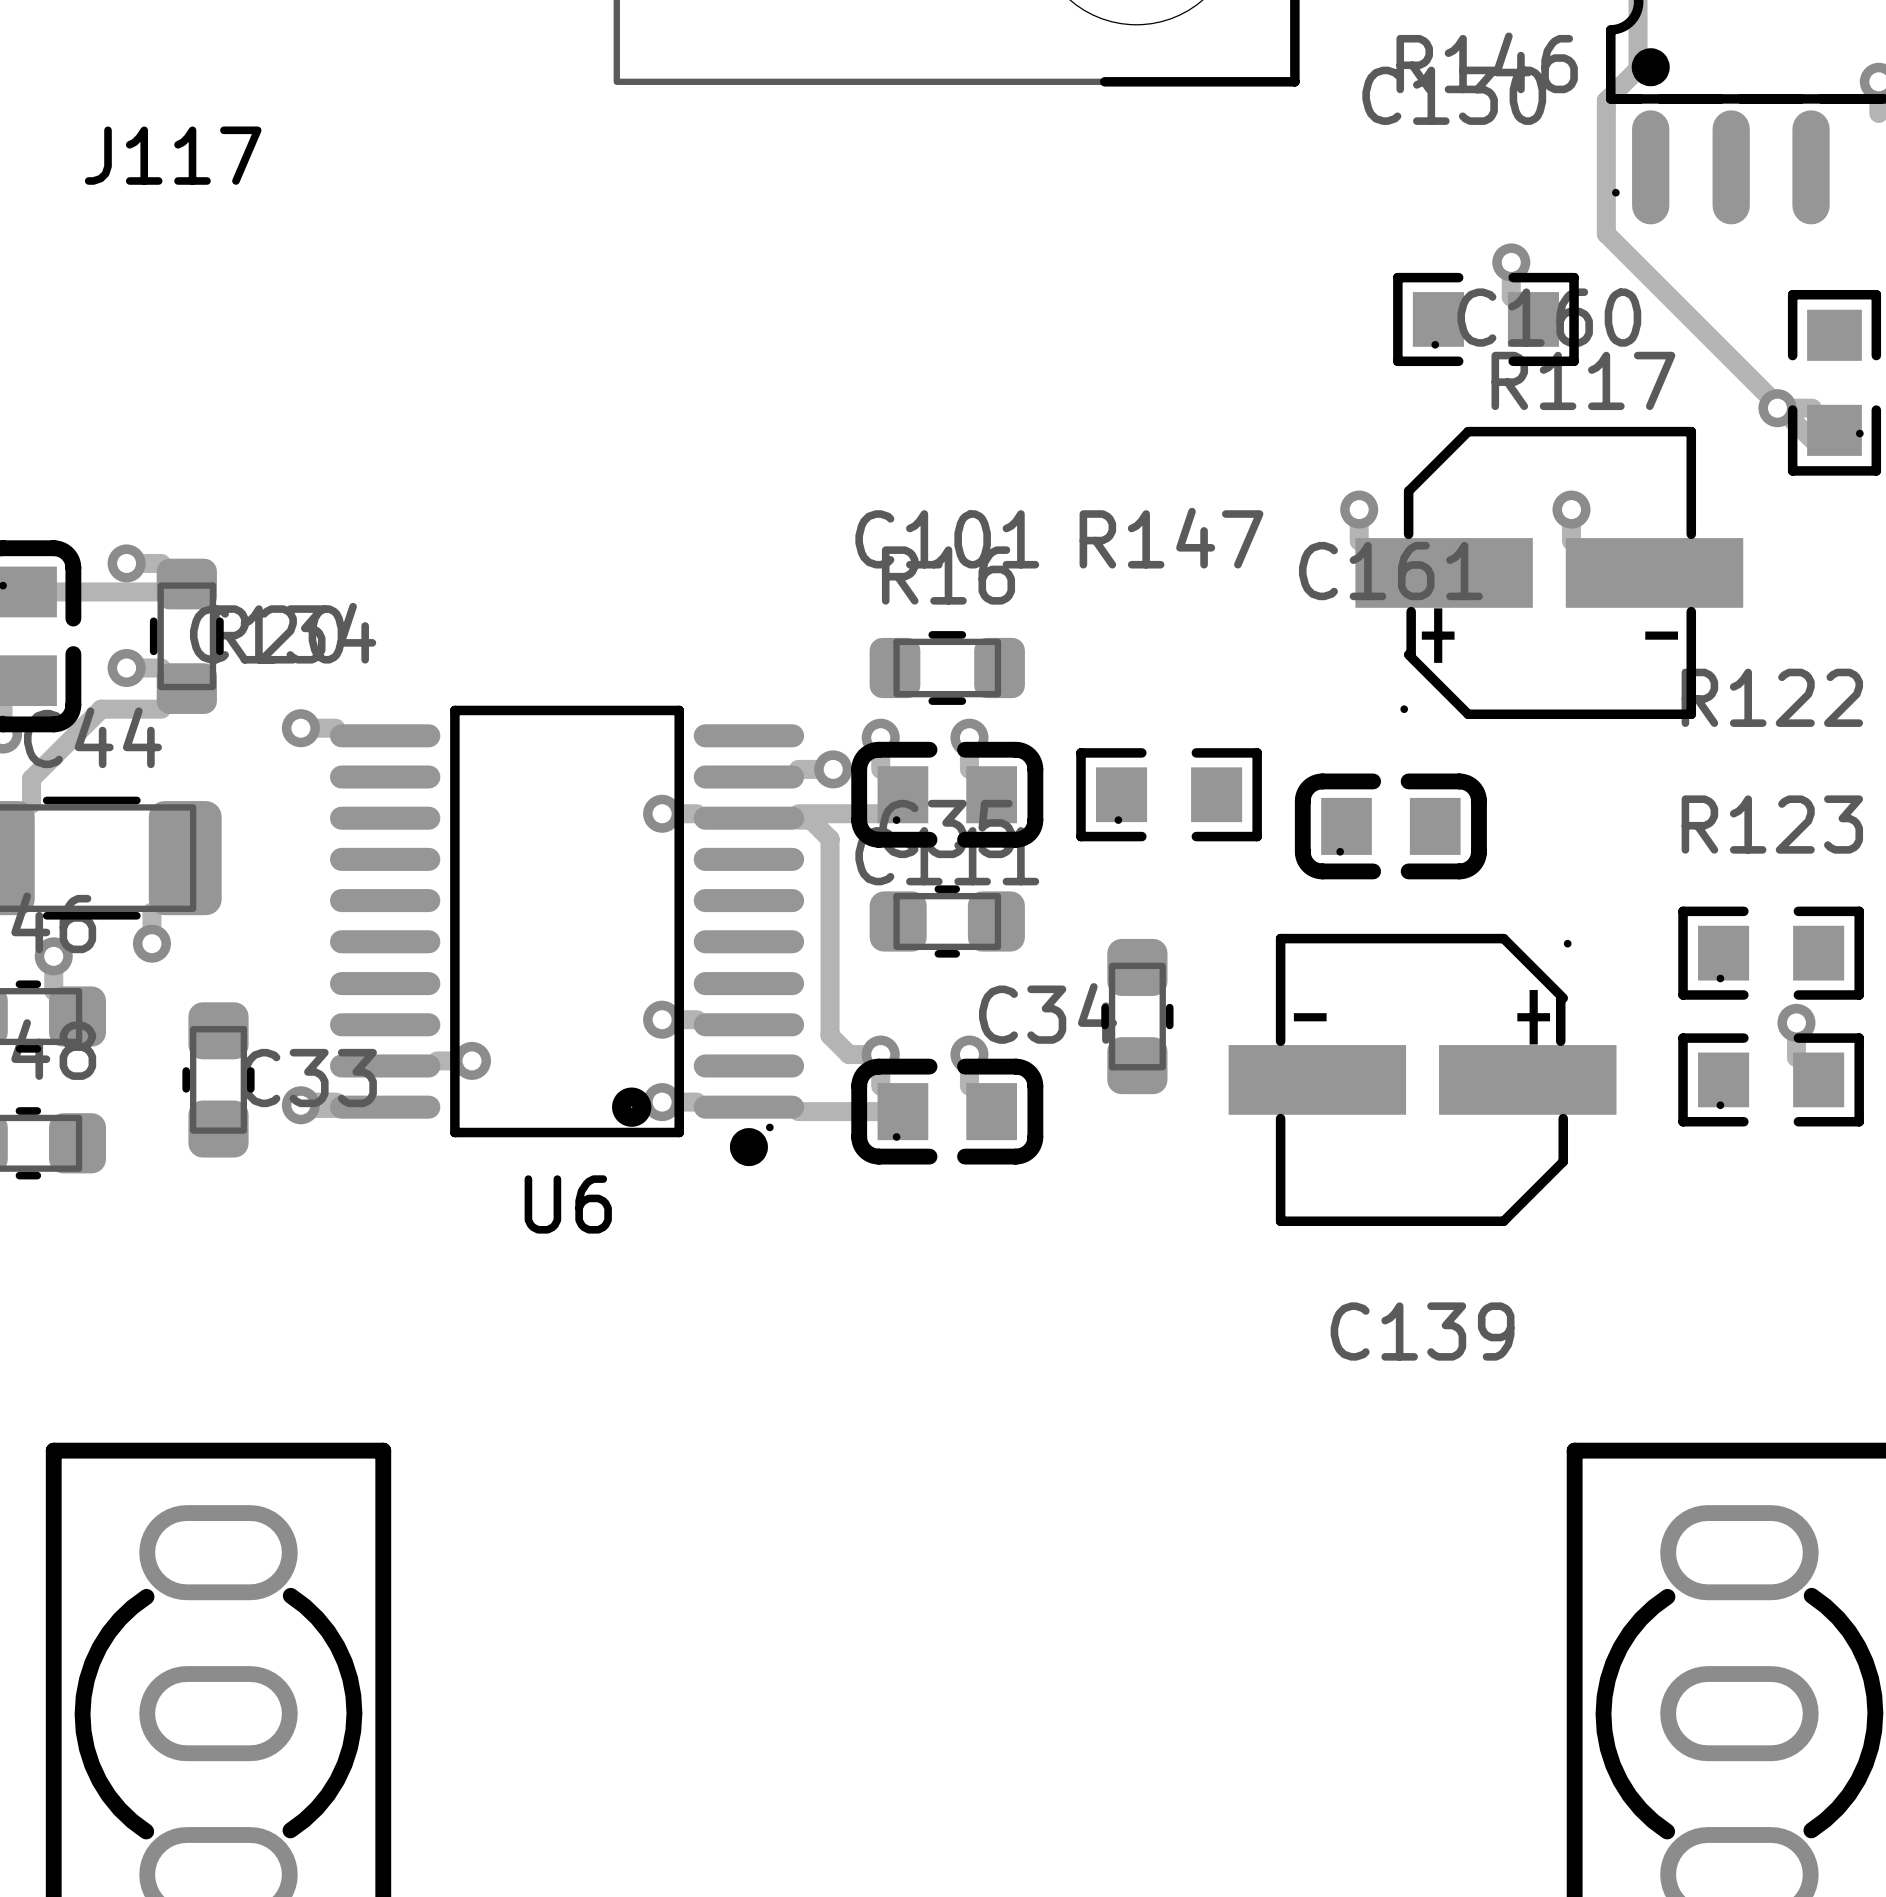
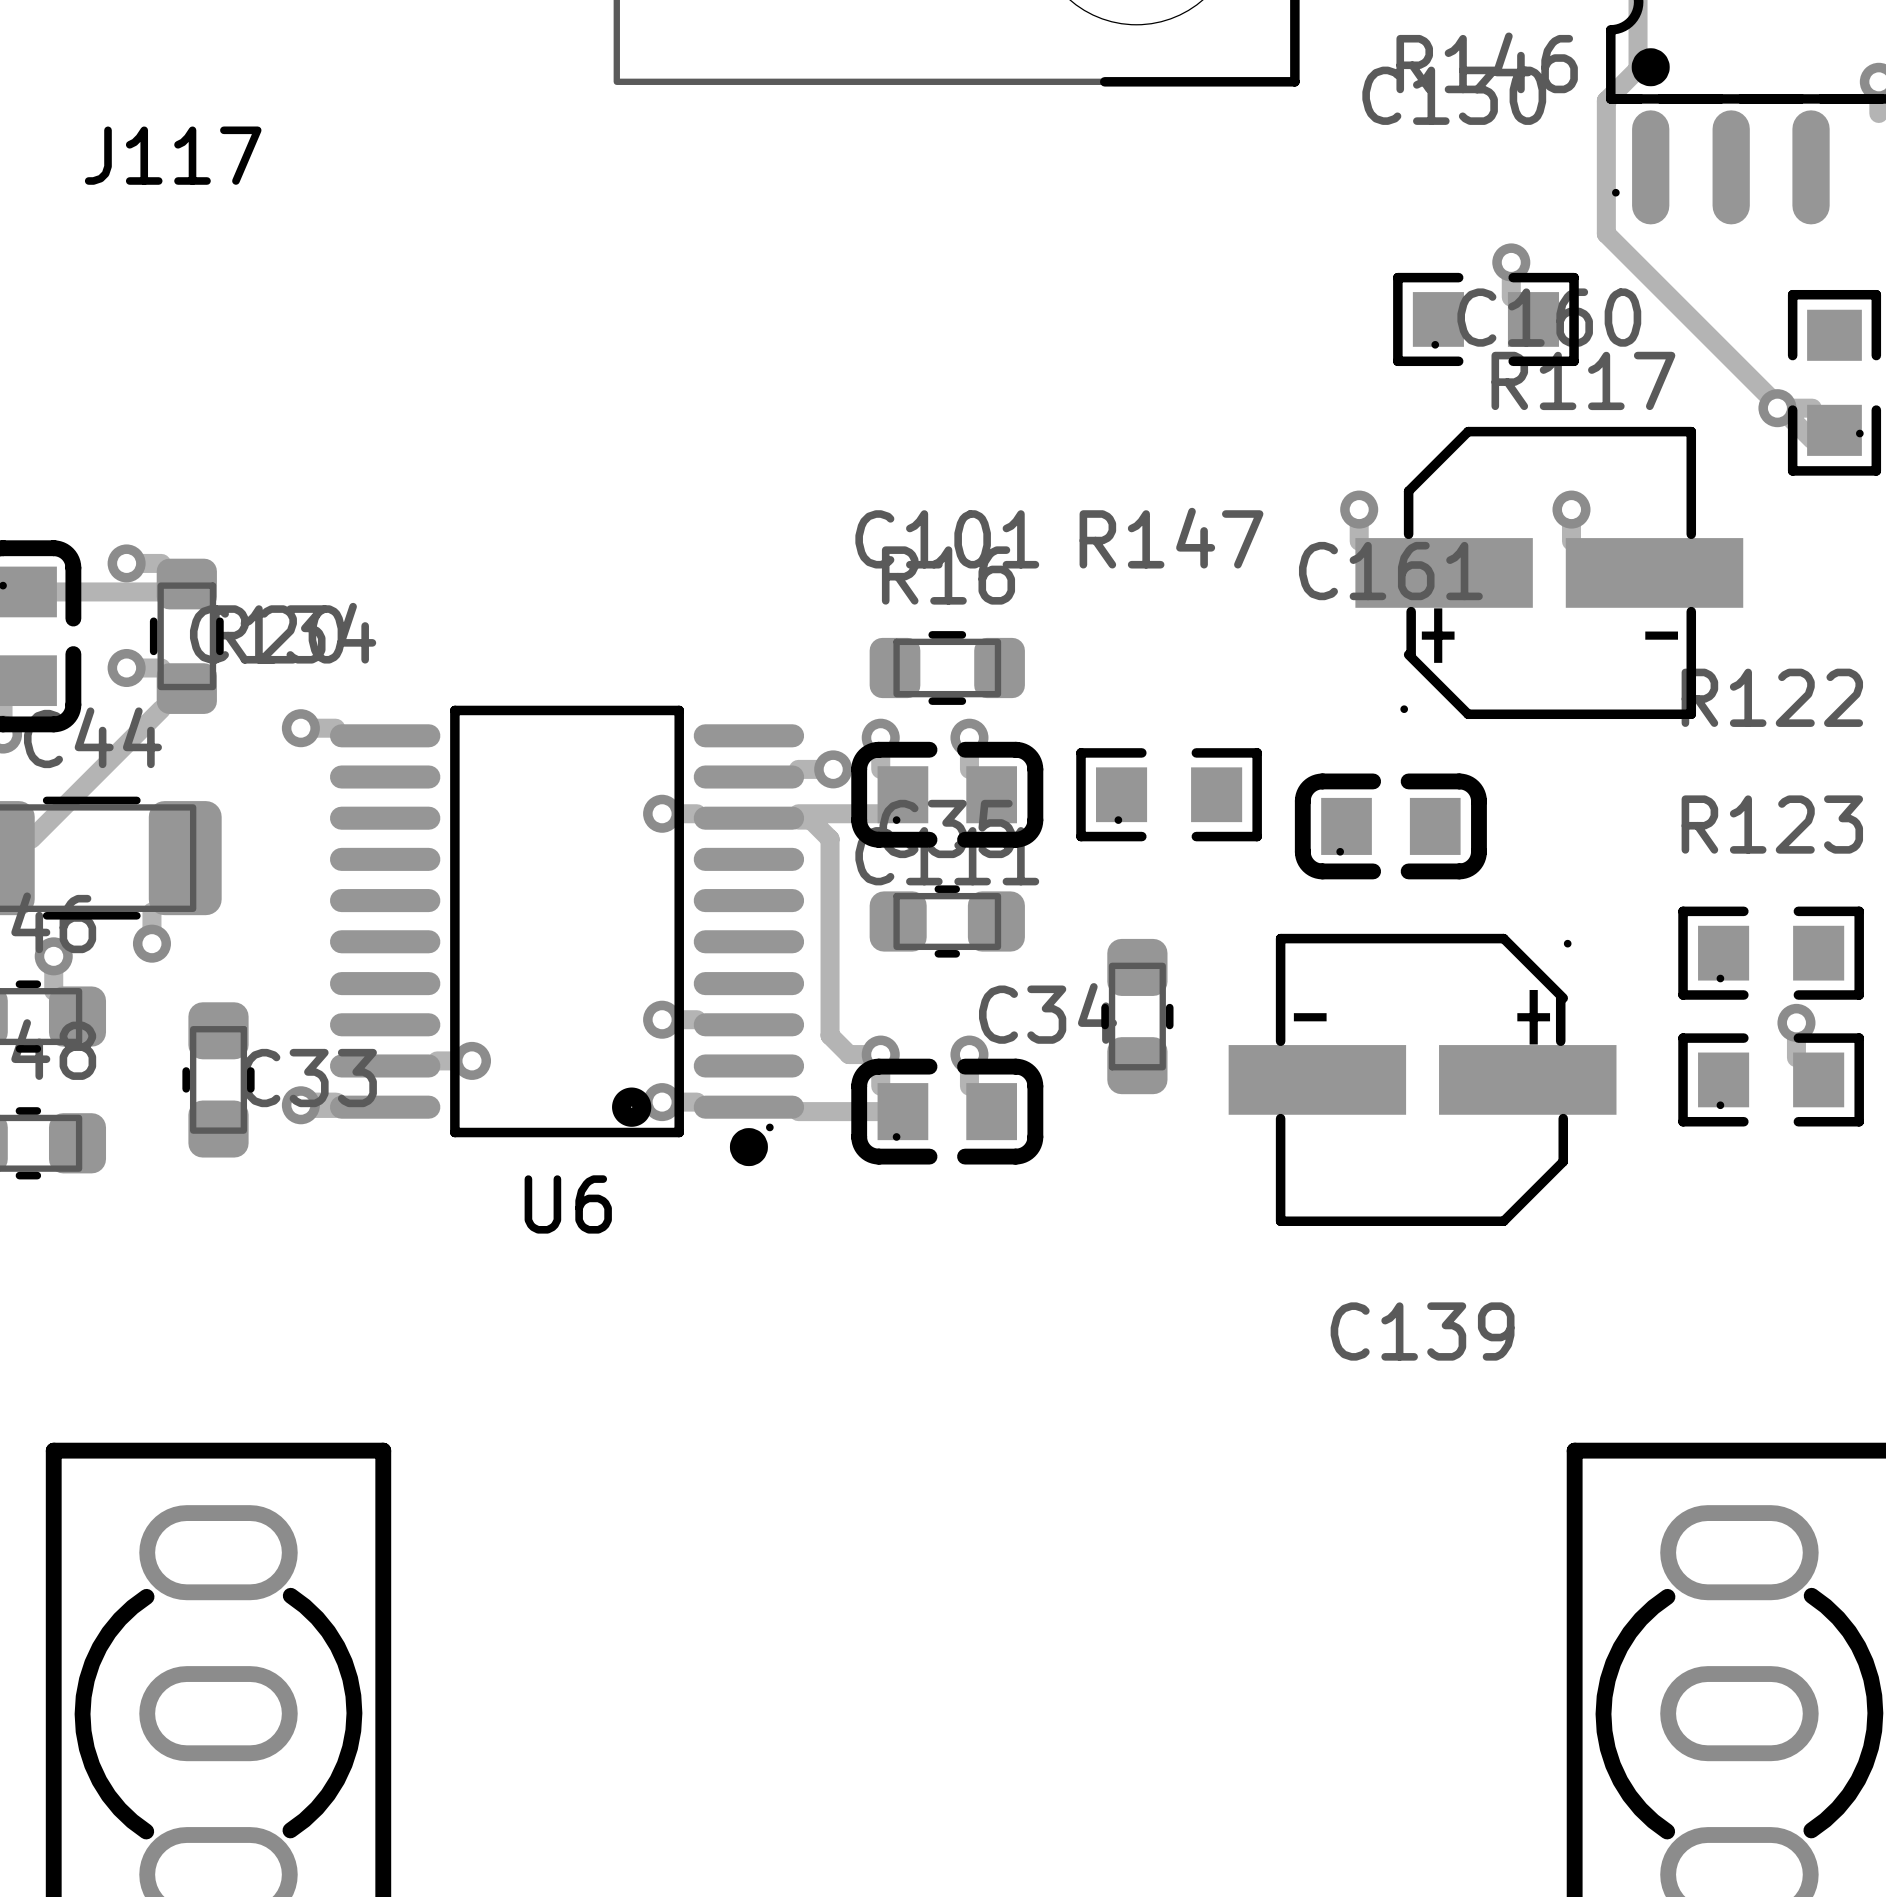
track: (161, 709) (101, 709) (31, 778) (31, 804) -> (161, 709) (31, 839)

